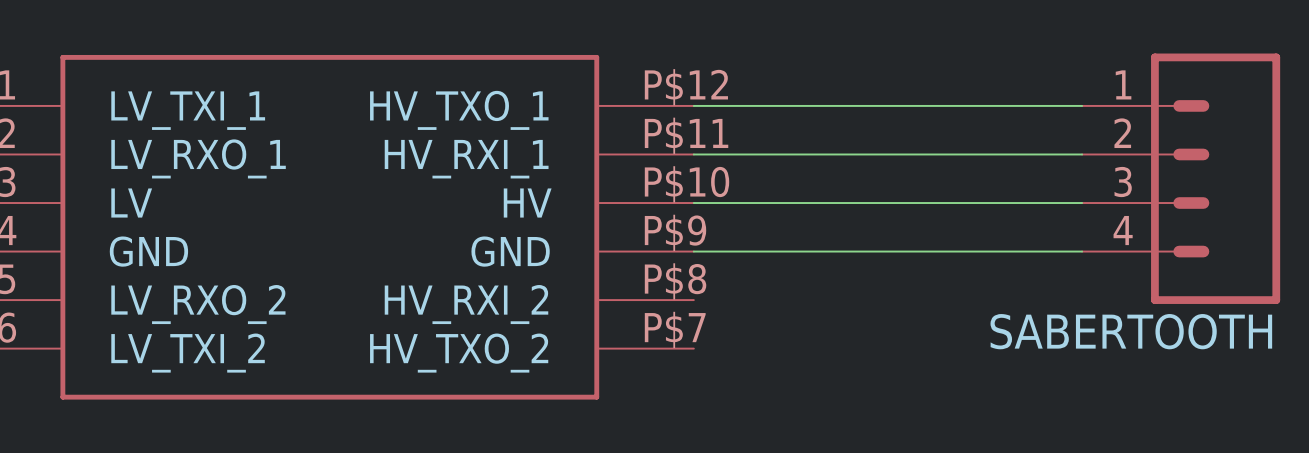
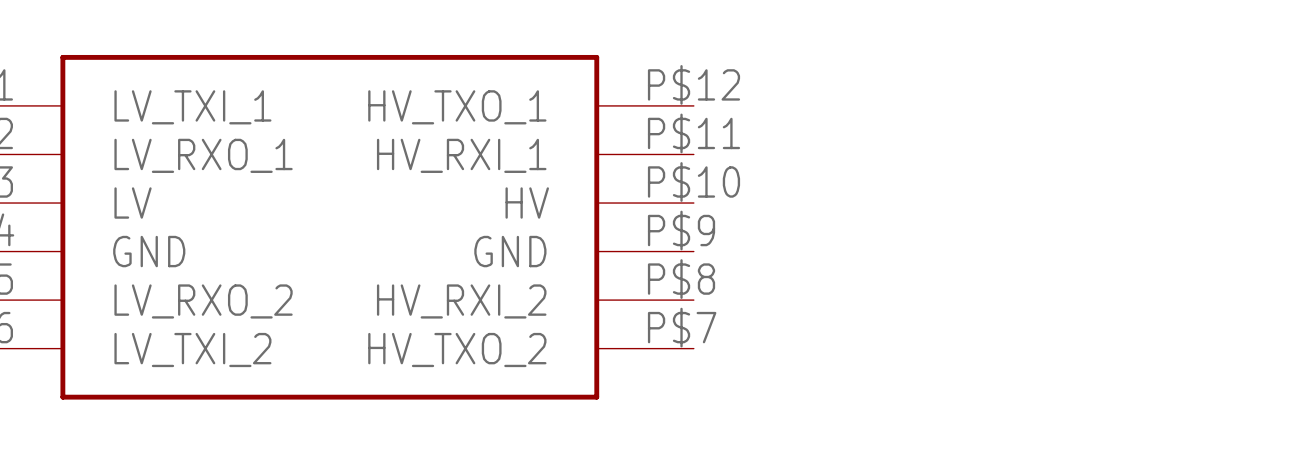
wire: (693, 105) (1082, 105) -> none
wire: (693, 154) (1082, 154) -> none
SABERTOOTH: (1181, 178) -> none
wire: (693, 203) (1082, 203) -> none
wire: (693, 251) (1082, 251) -> none

